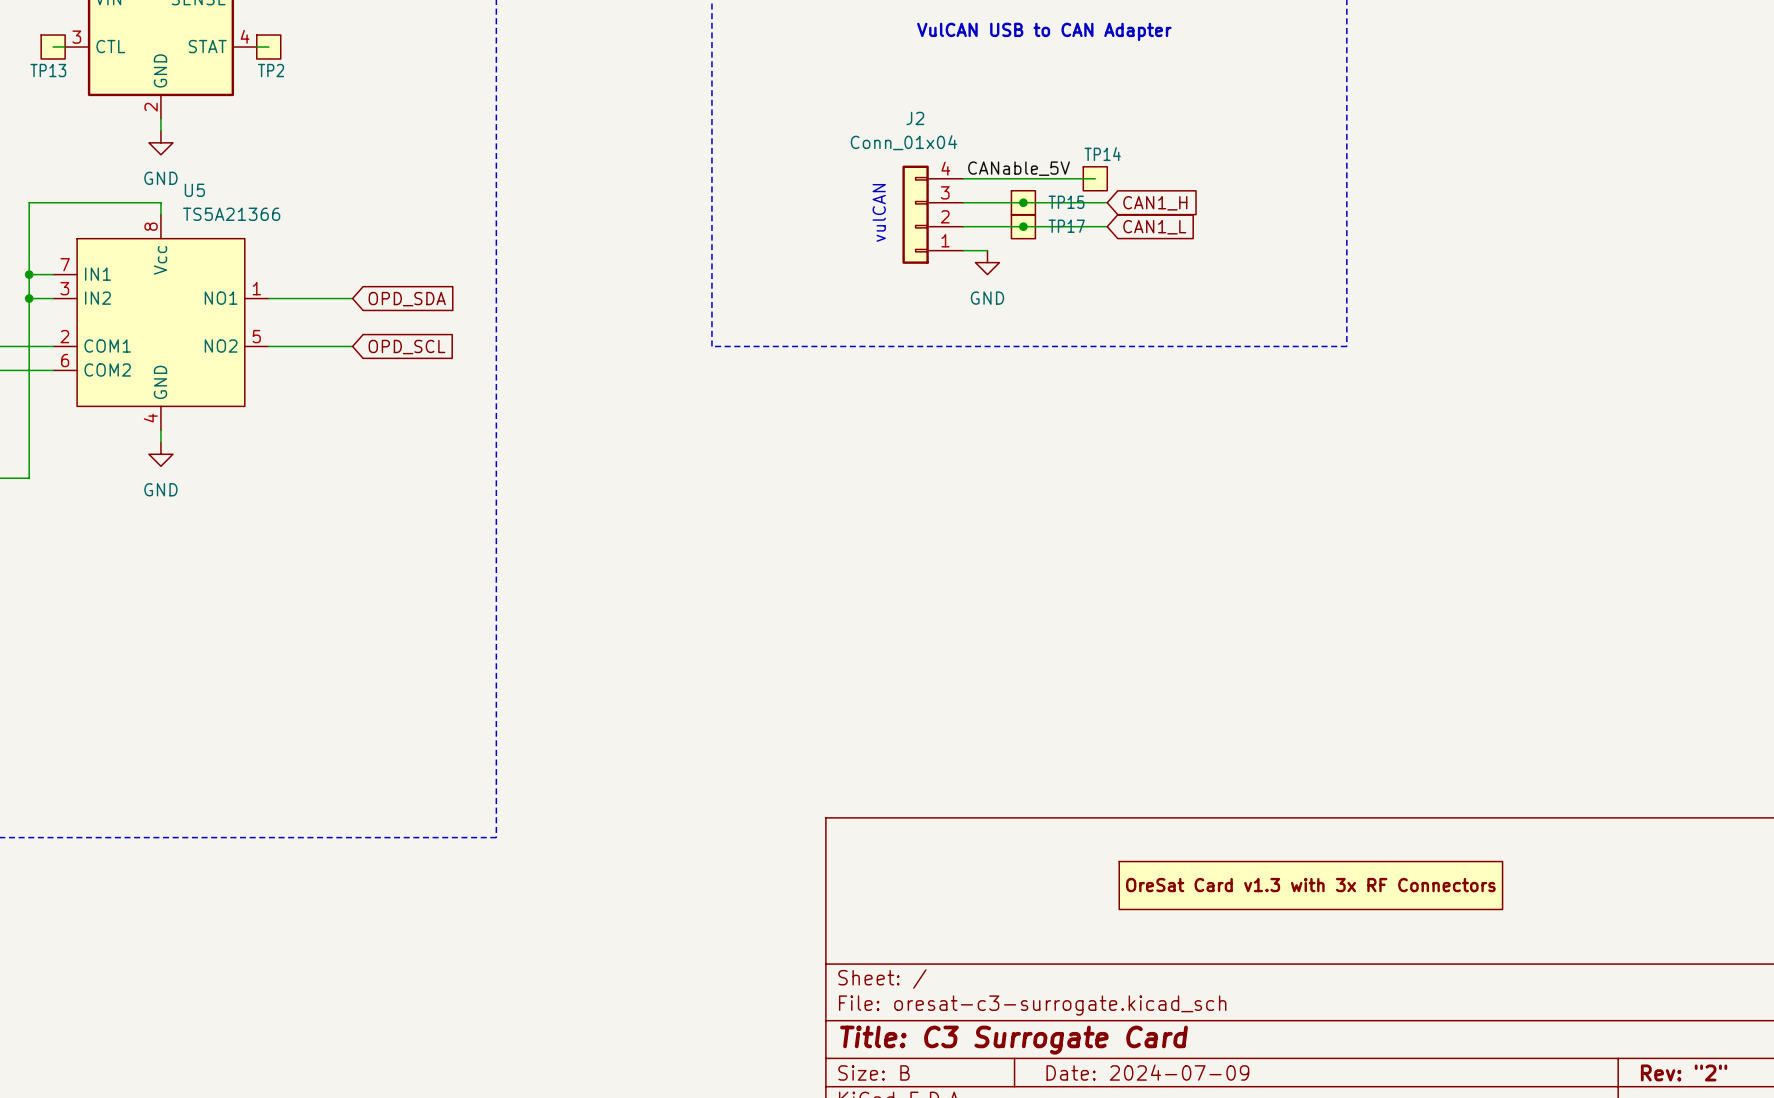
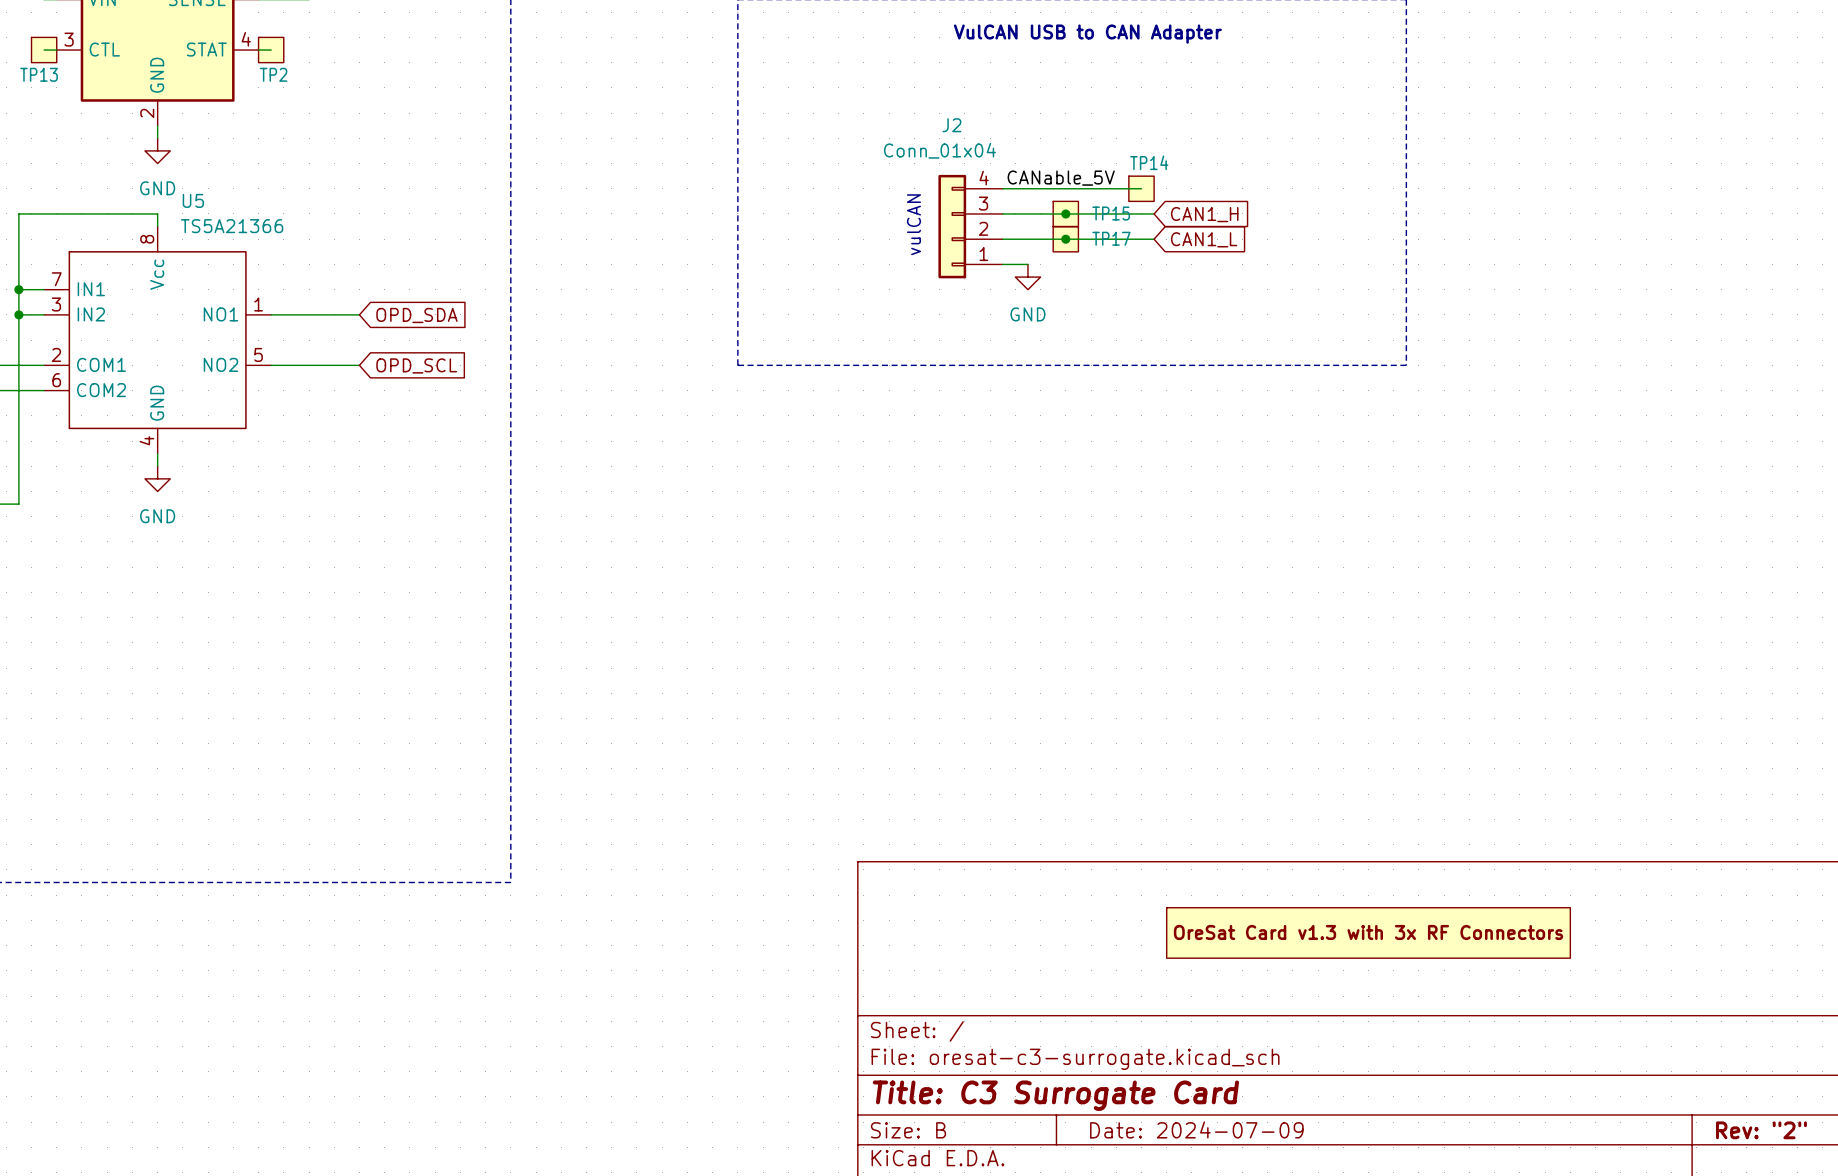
U5 symbol: [53, 214, 269, 431] -> [44, 226, 272, 454]

